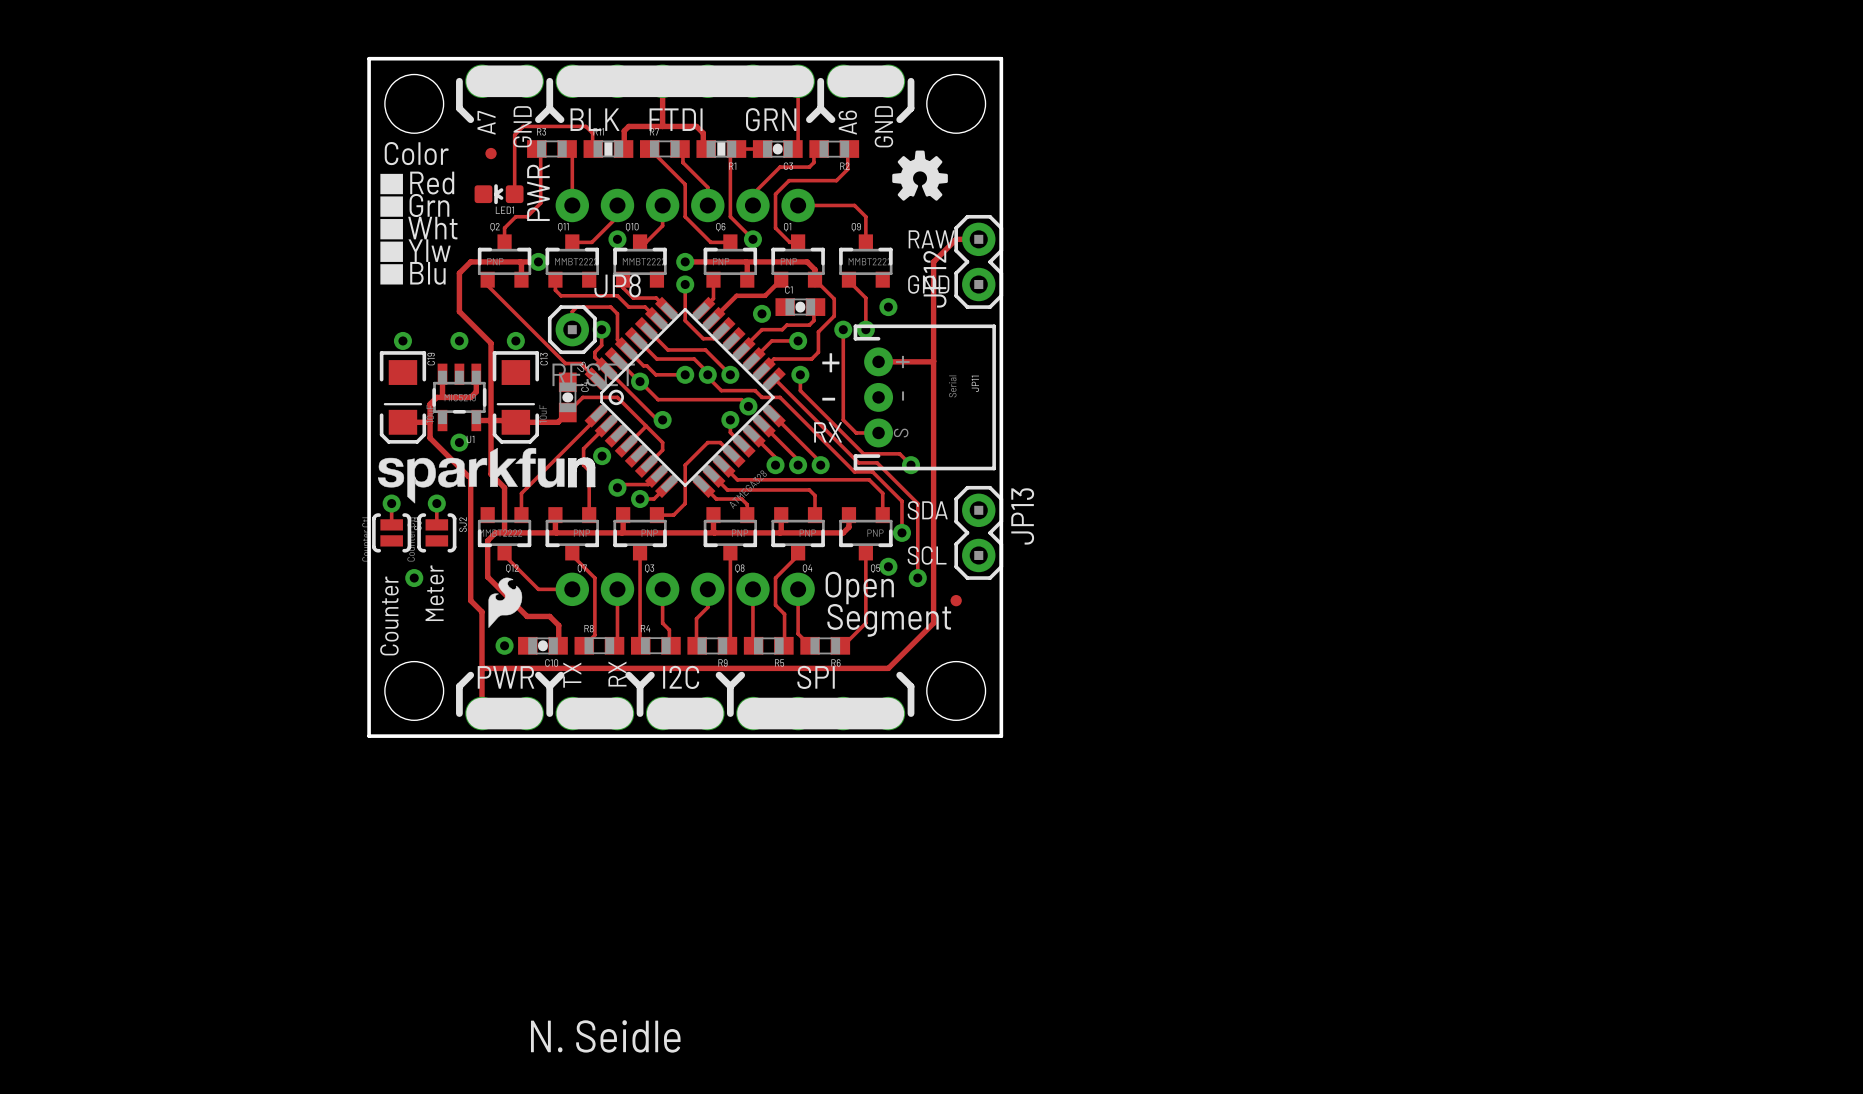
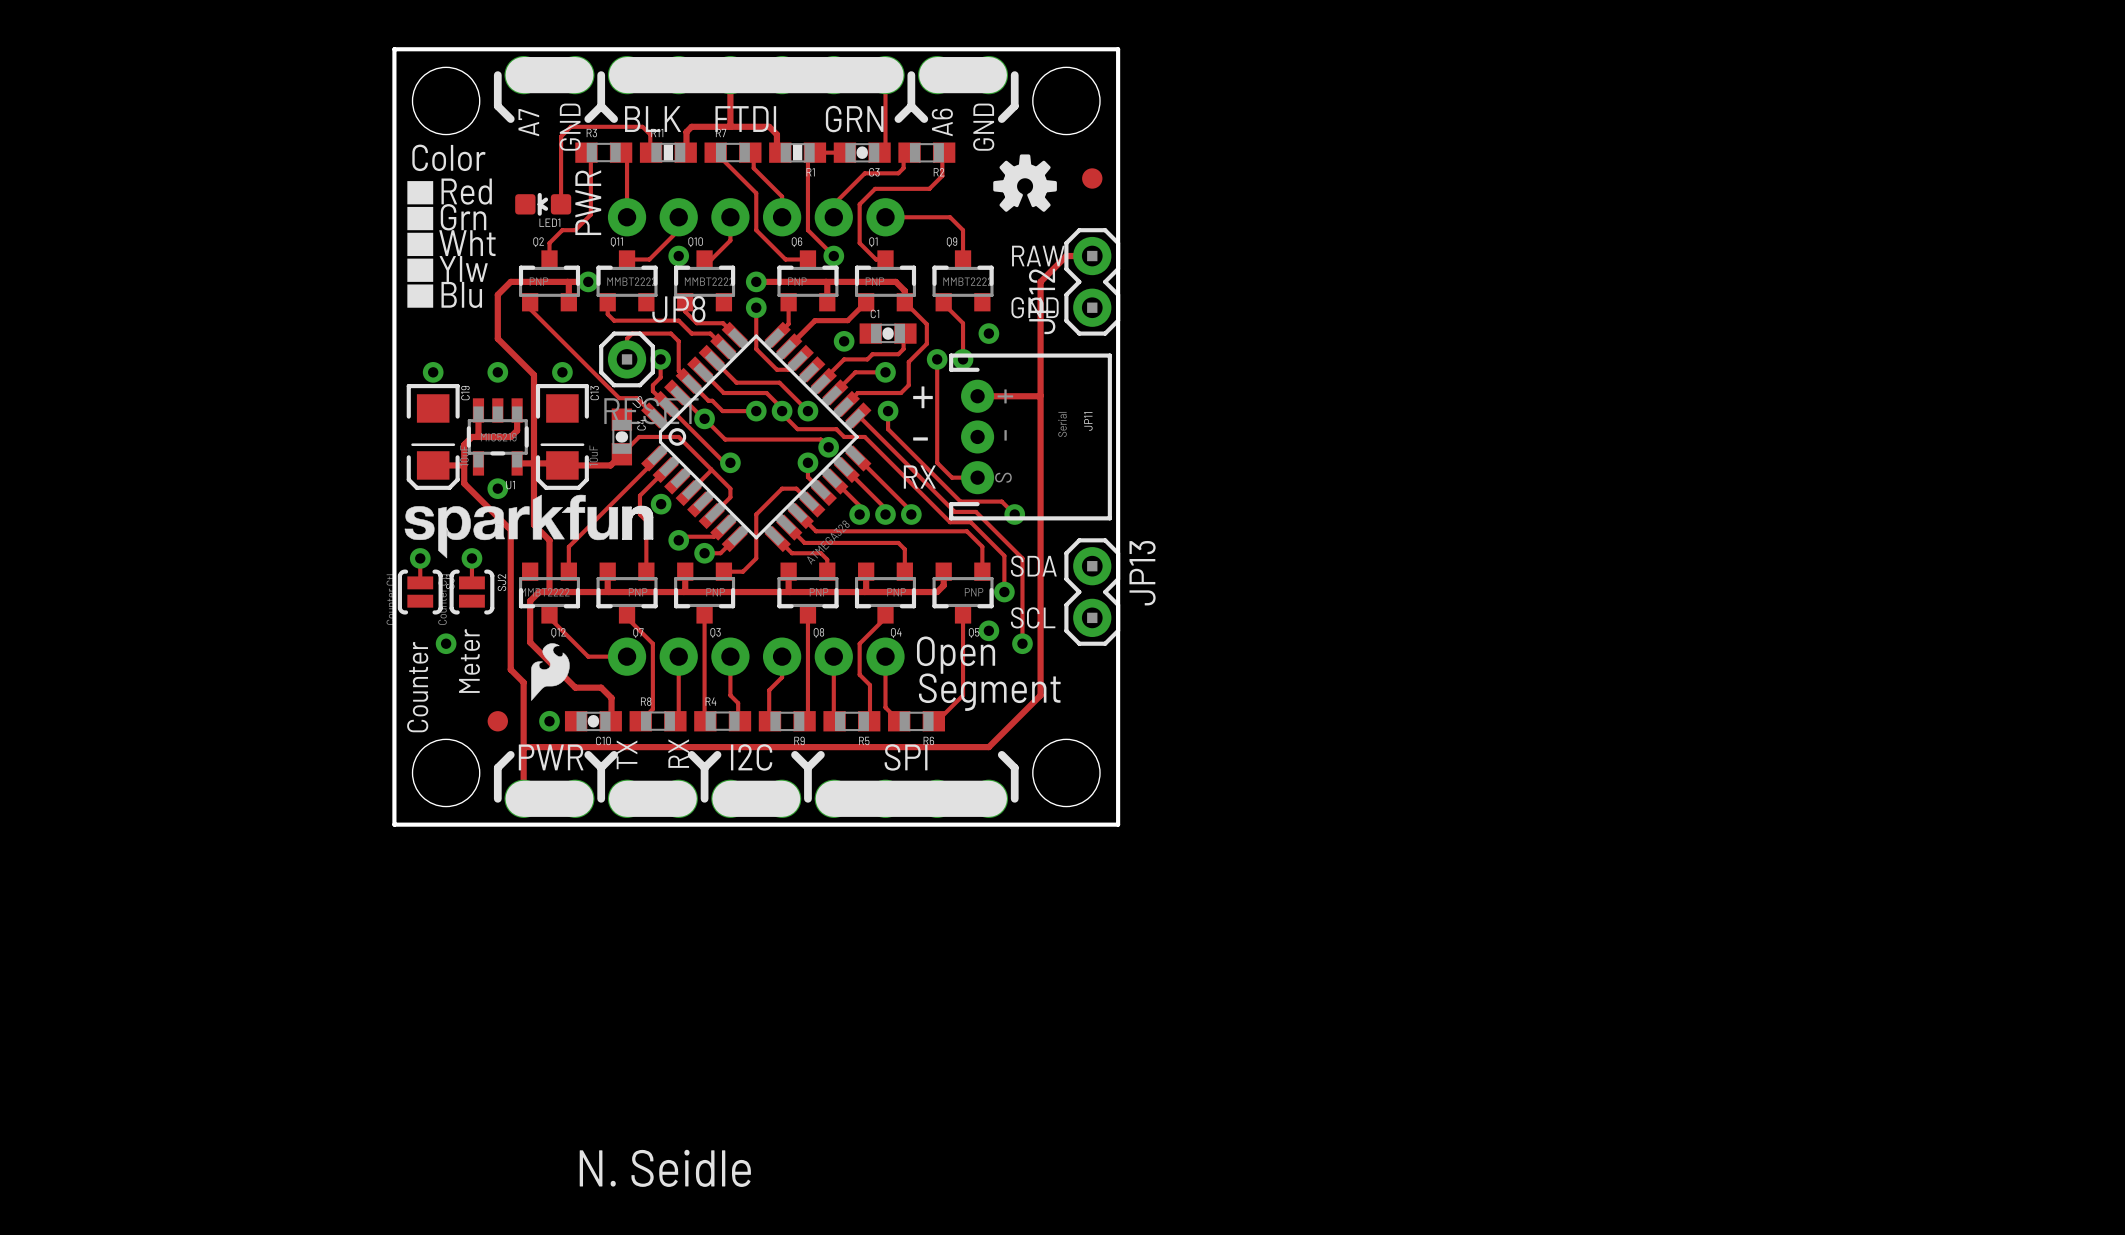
part: (491, 153) -> none
part: none -> (1092, 178)
part: (956, 600) -> none
part: none -> (497, 721)

